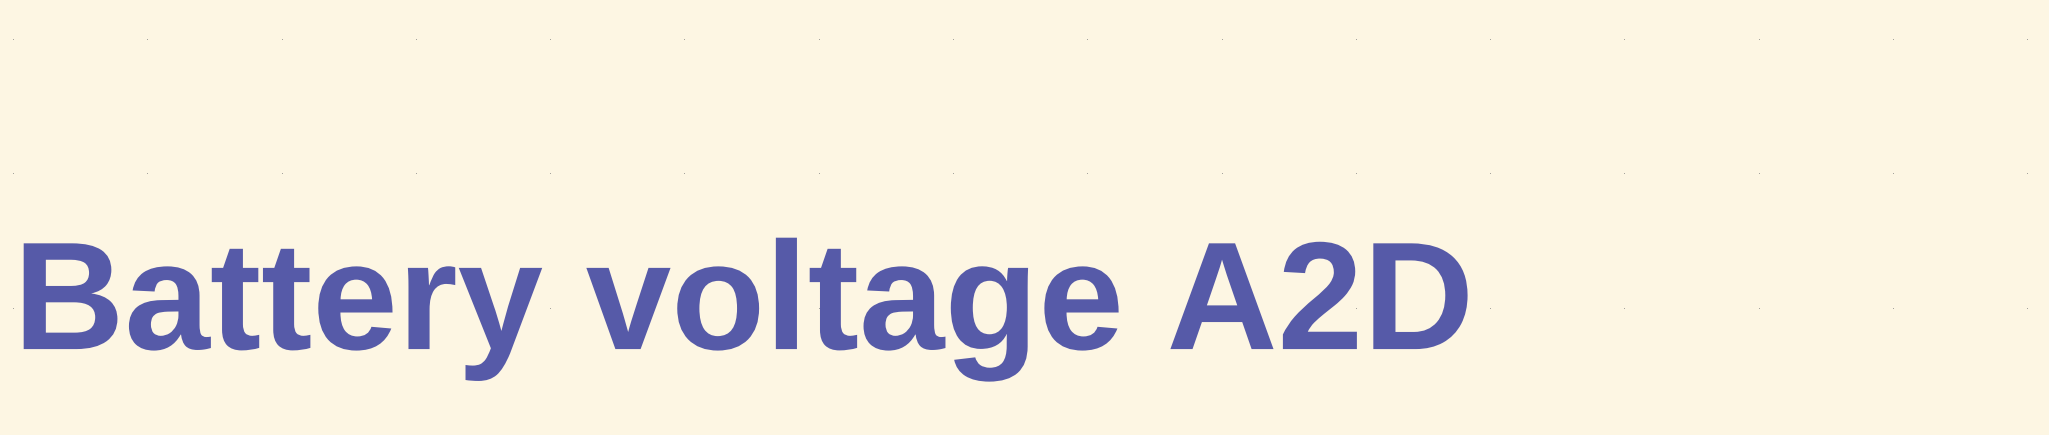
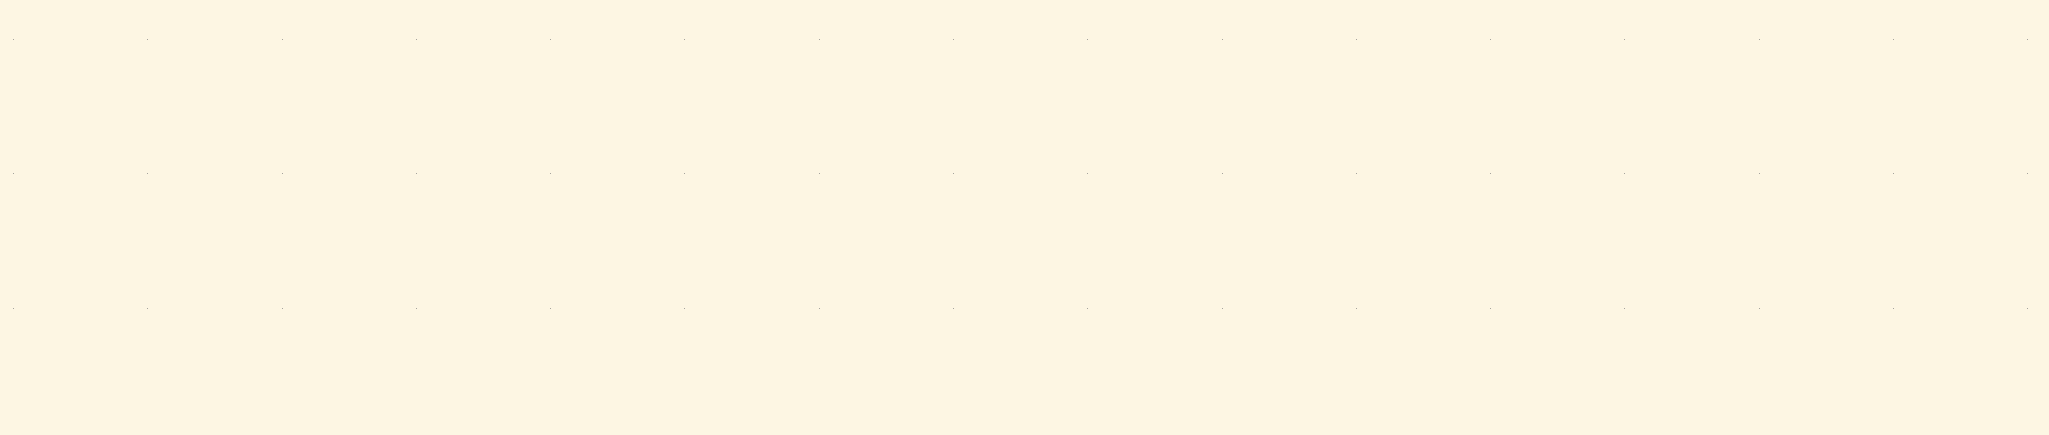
text: Battery voltage A2D (745, 309) -> none

